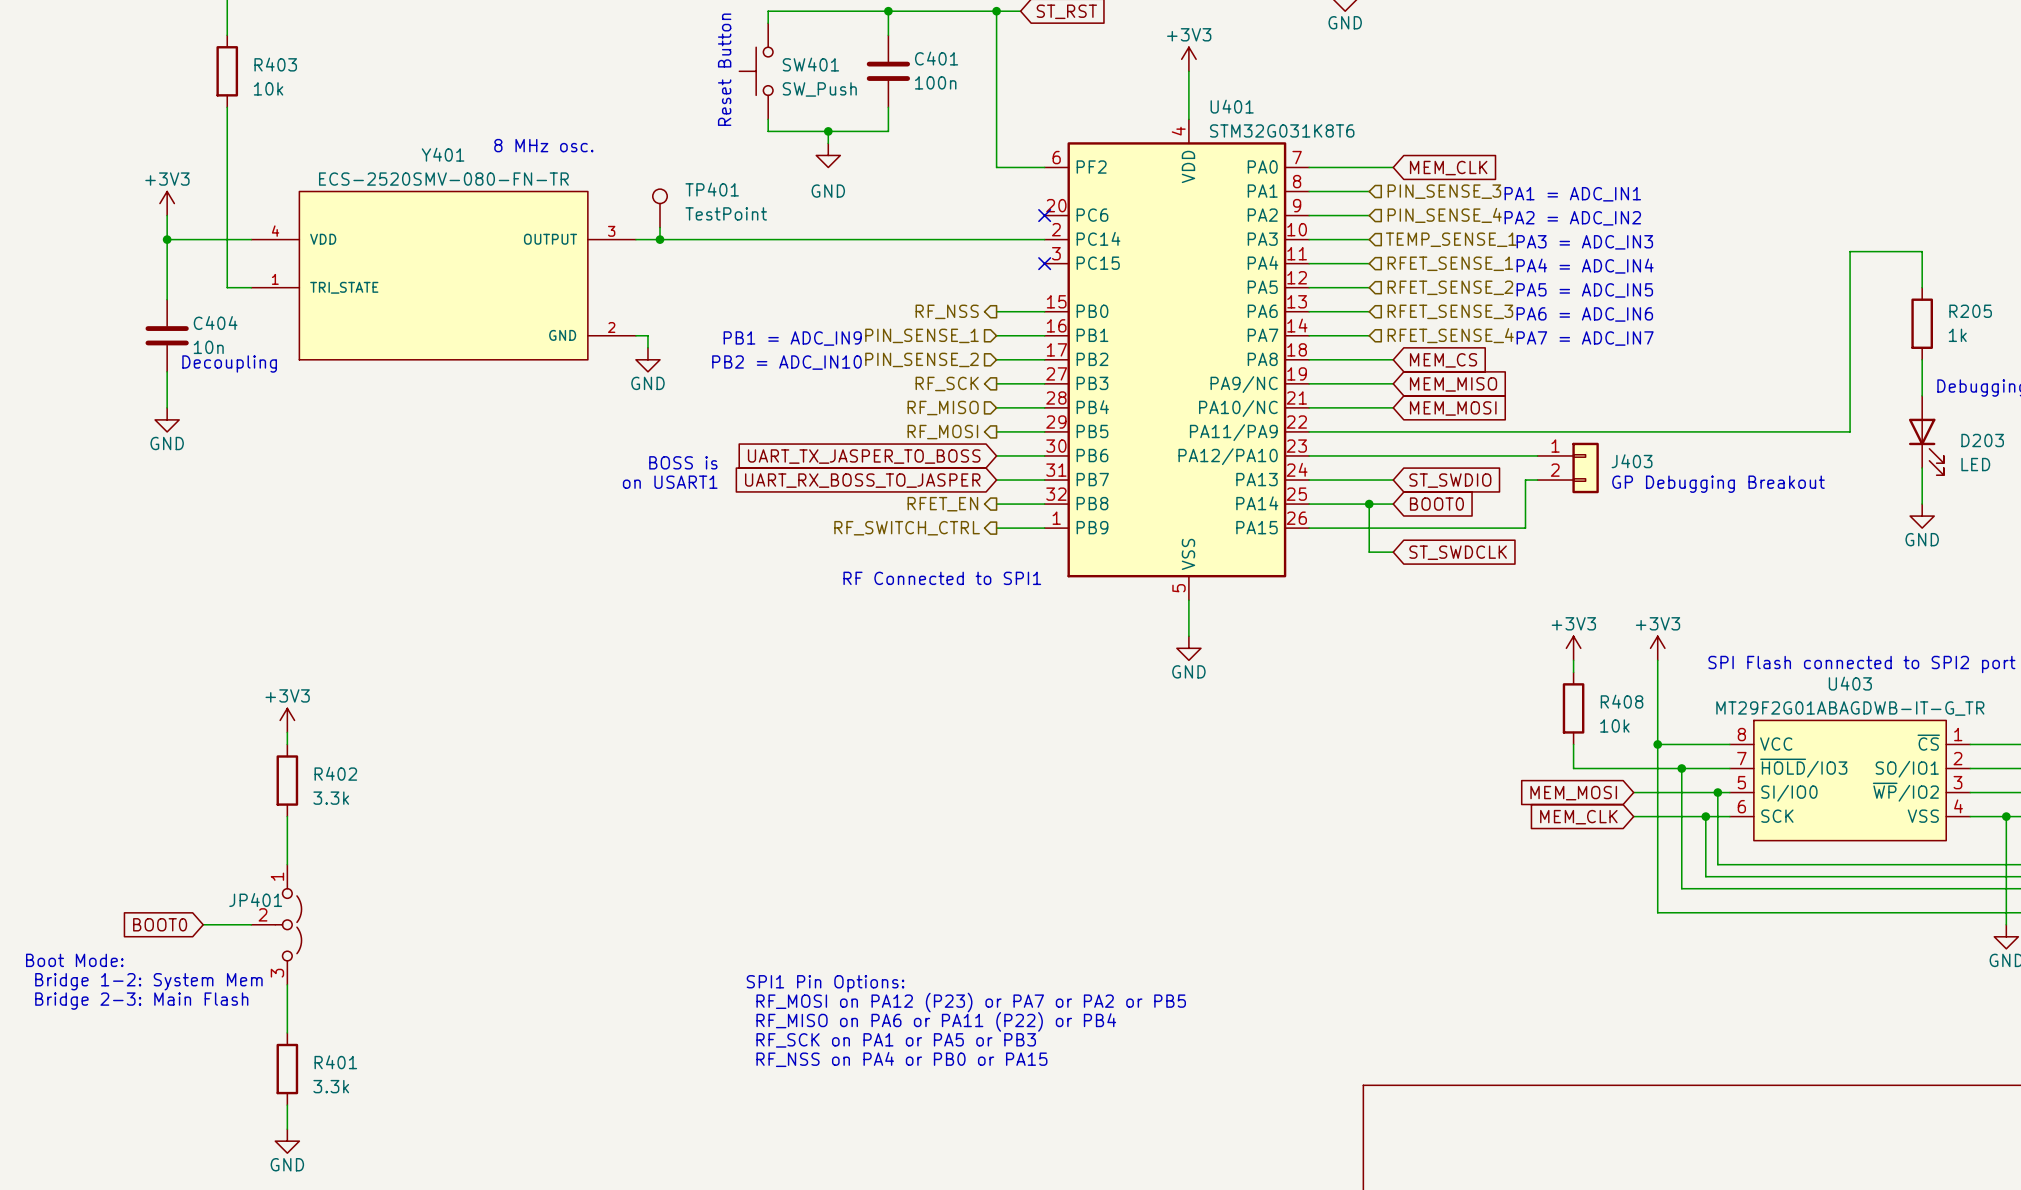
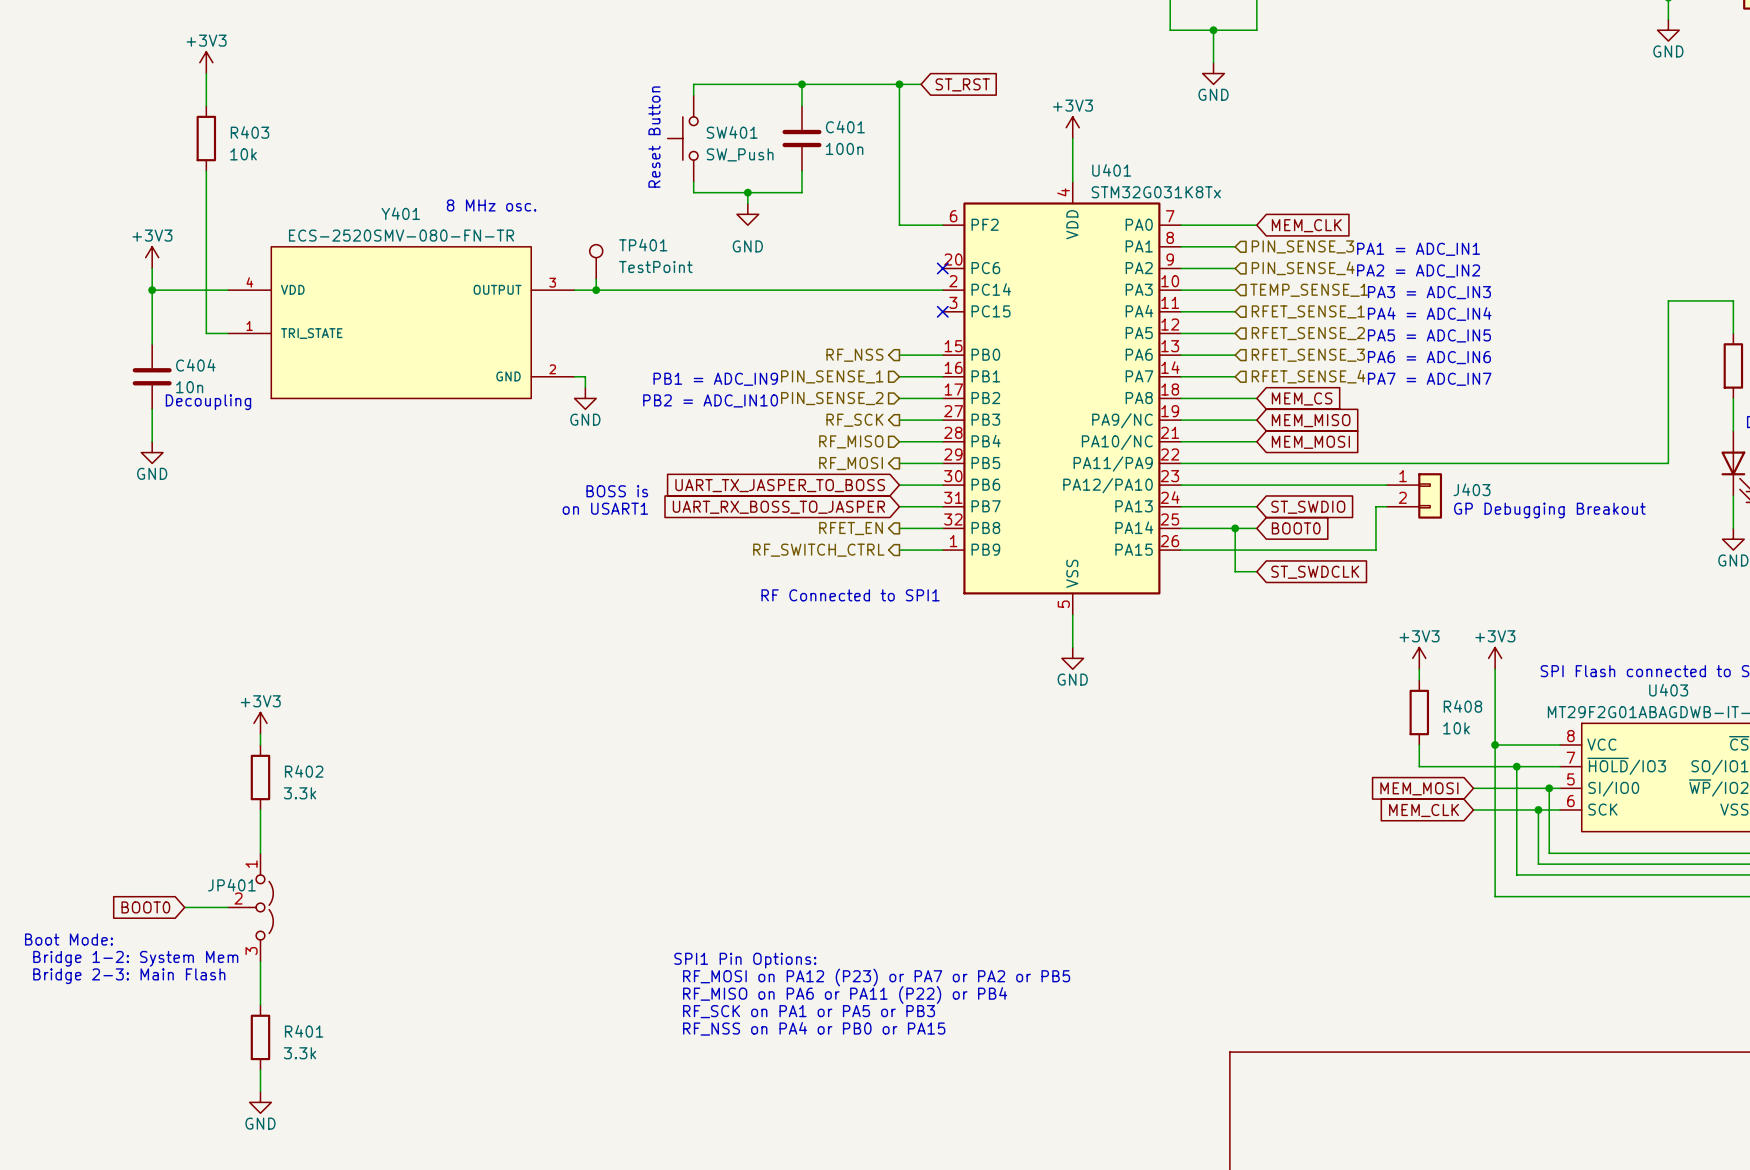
U401 value: STM32G031K8T6 (1282, 130) -> STM32G031K8Tx (1156, 192)

